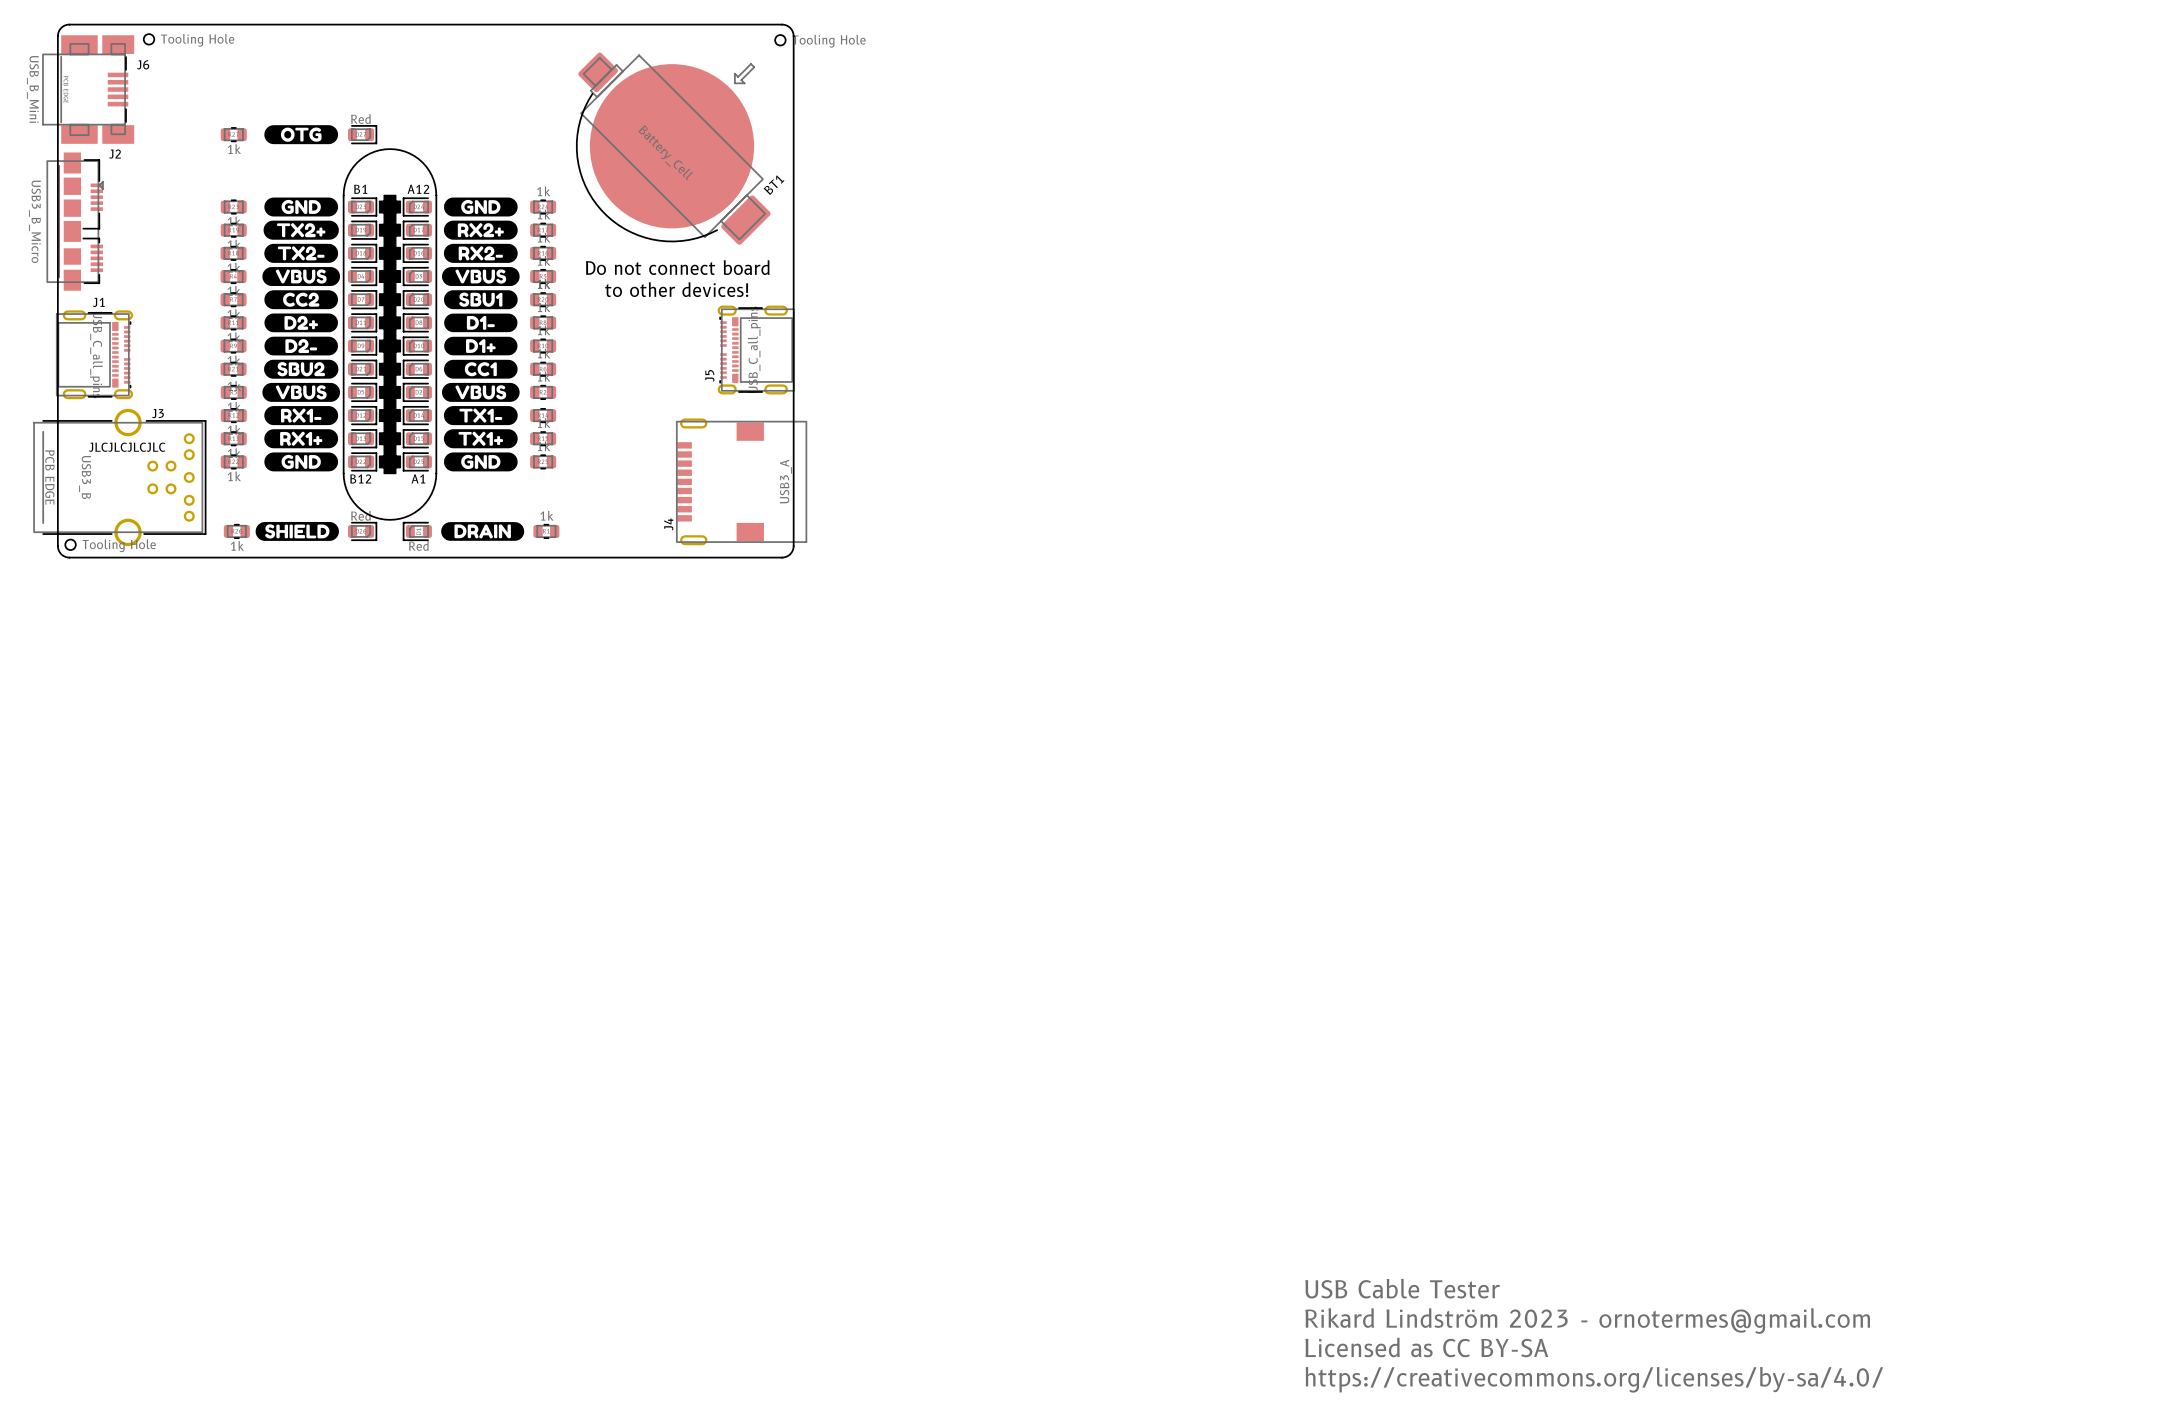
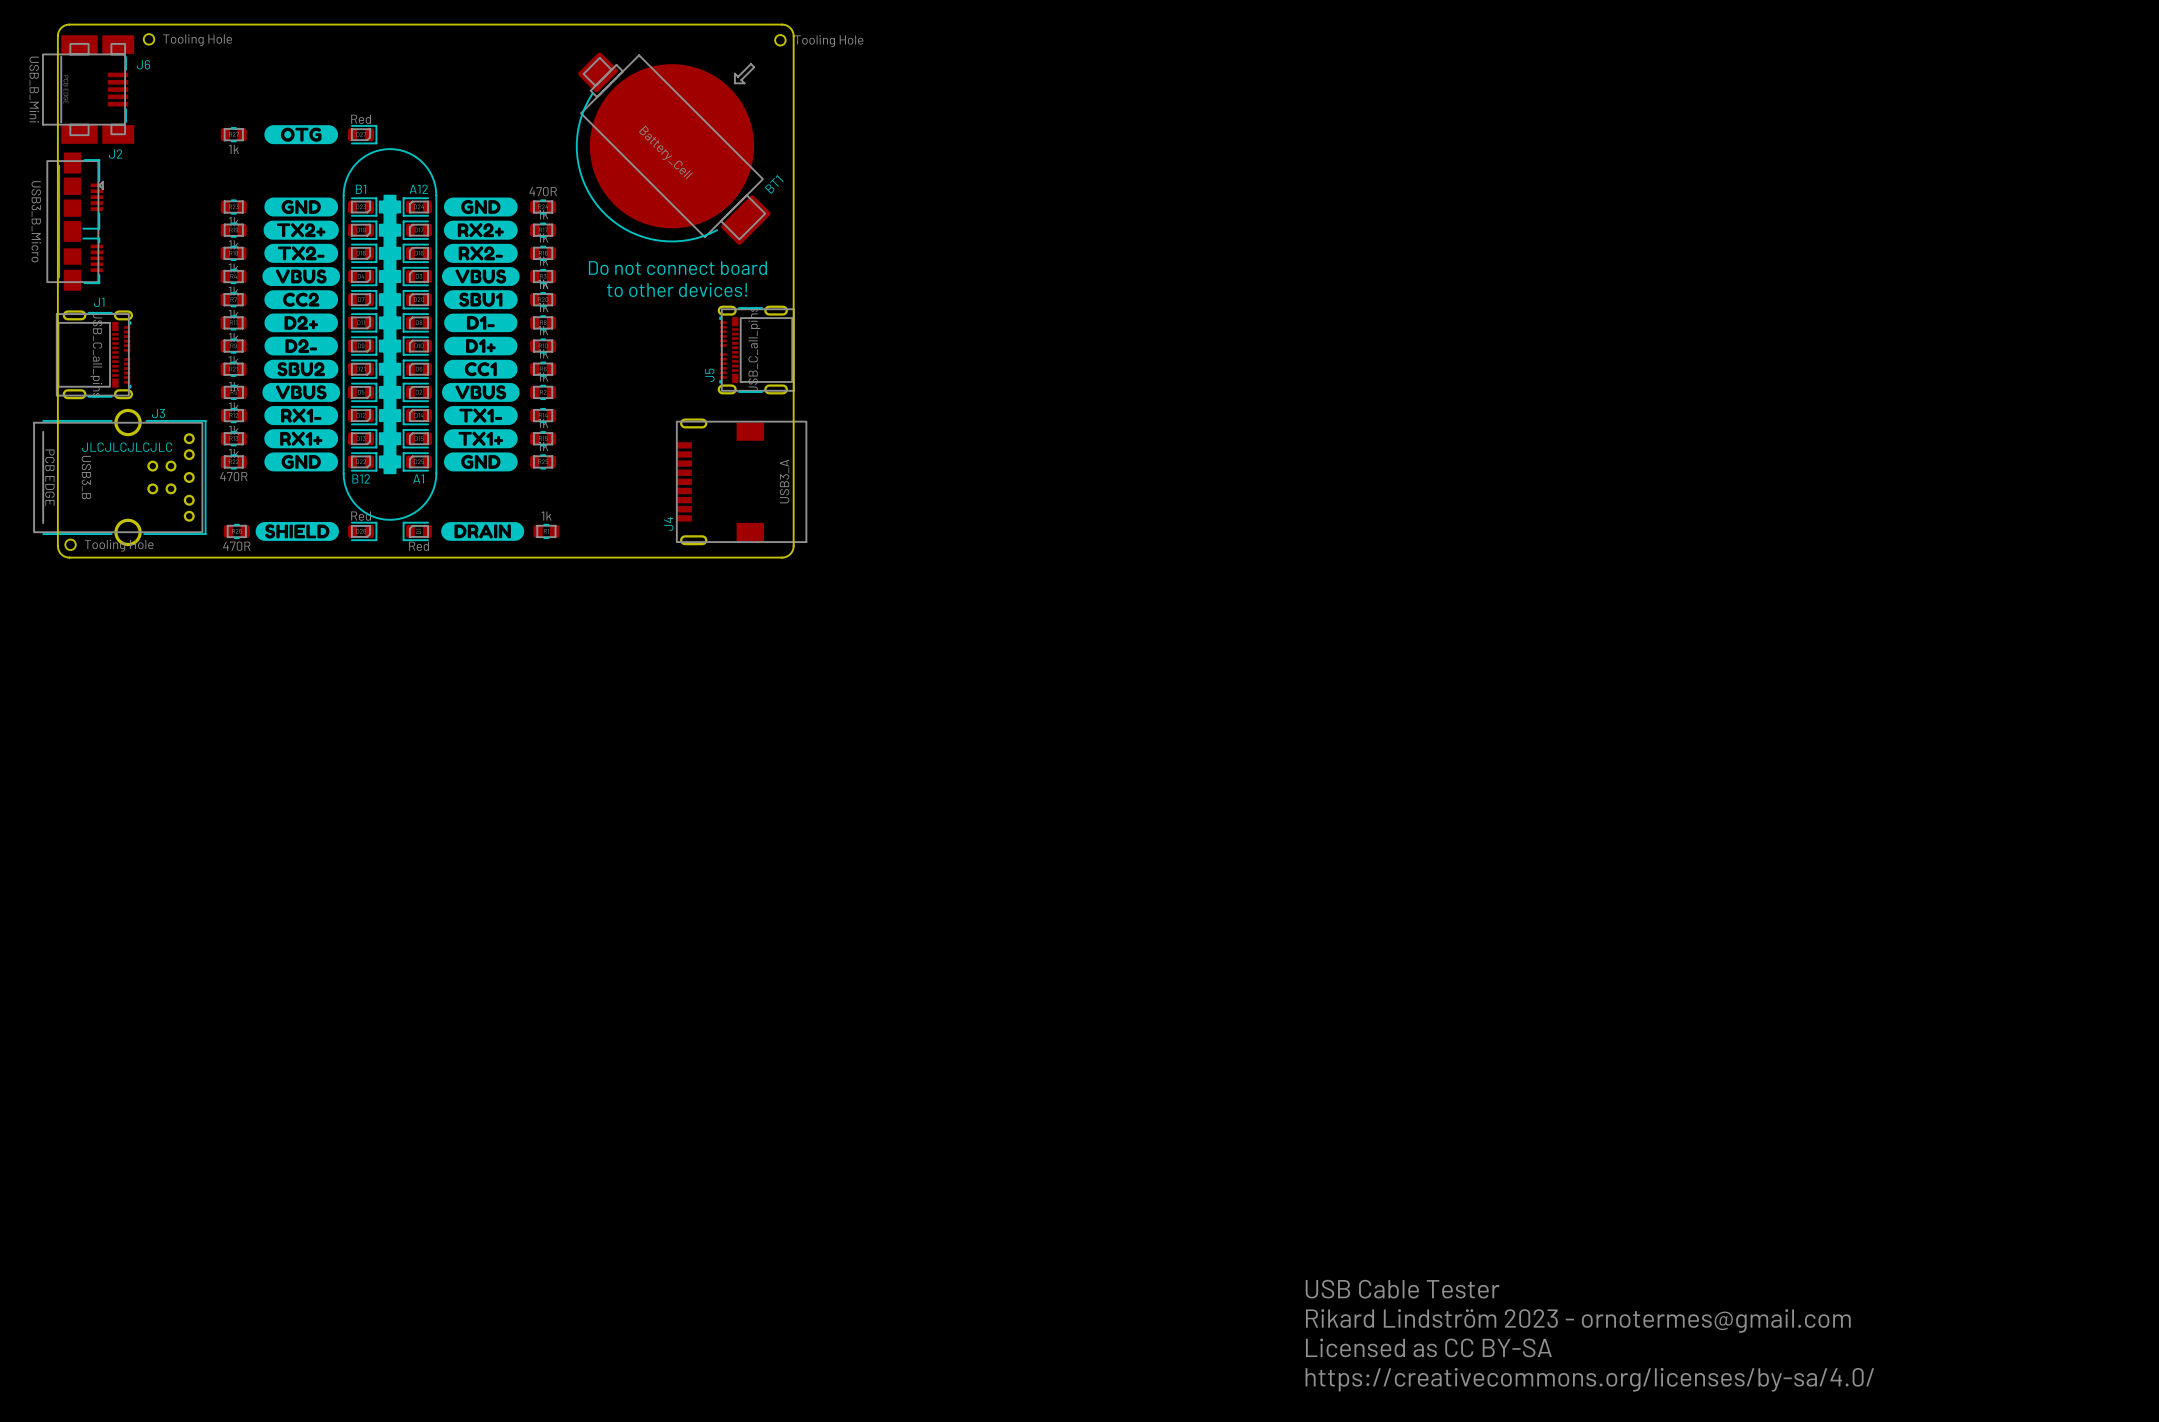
part value: 1k (543, 191) -> 470R (543, 191)
part value: 1k (234, 476) -> 470R (233, 476)
part value: 1k (237, 545) -> 470R (236, 546)

